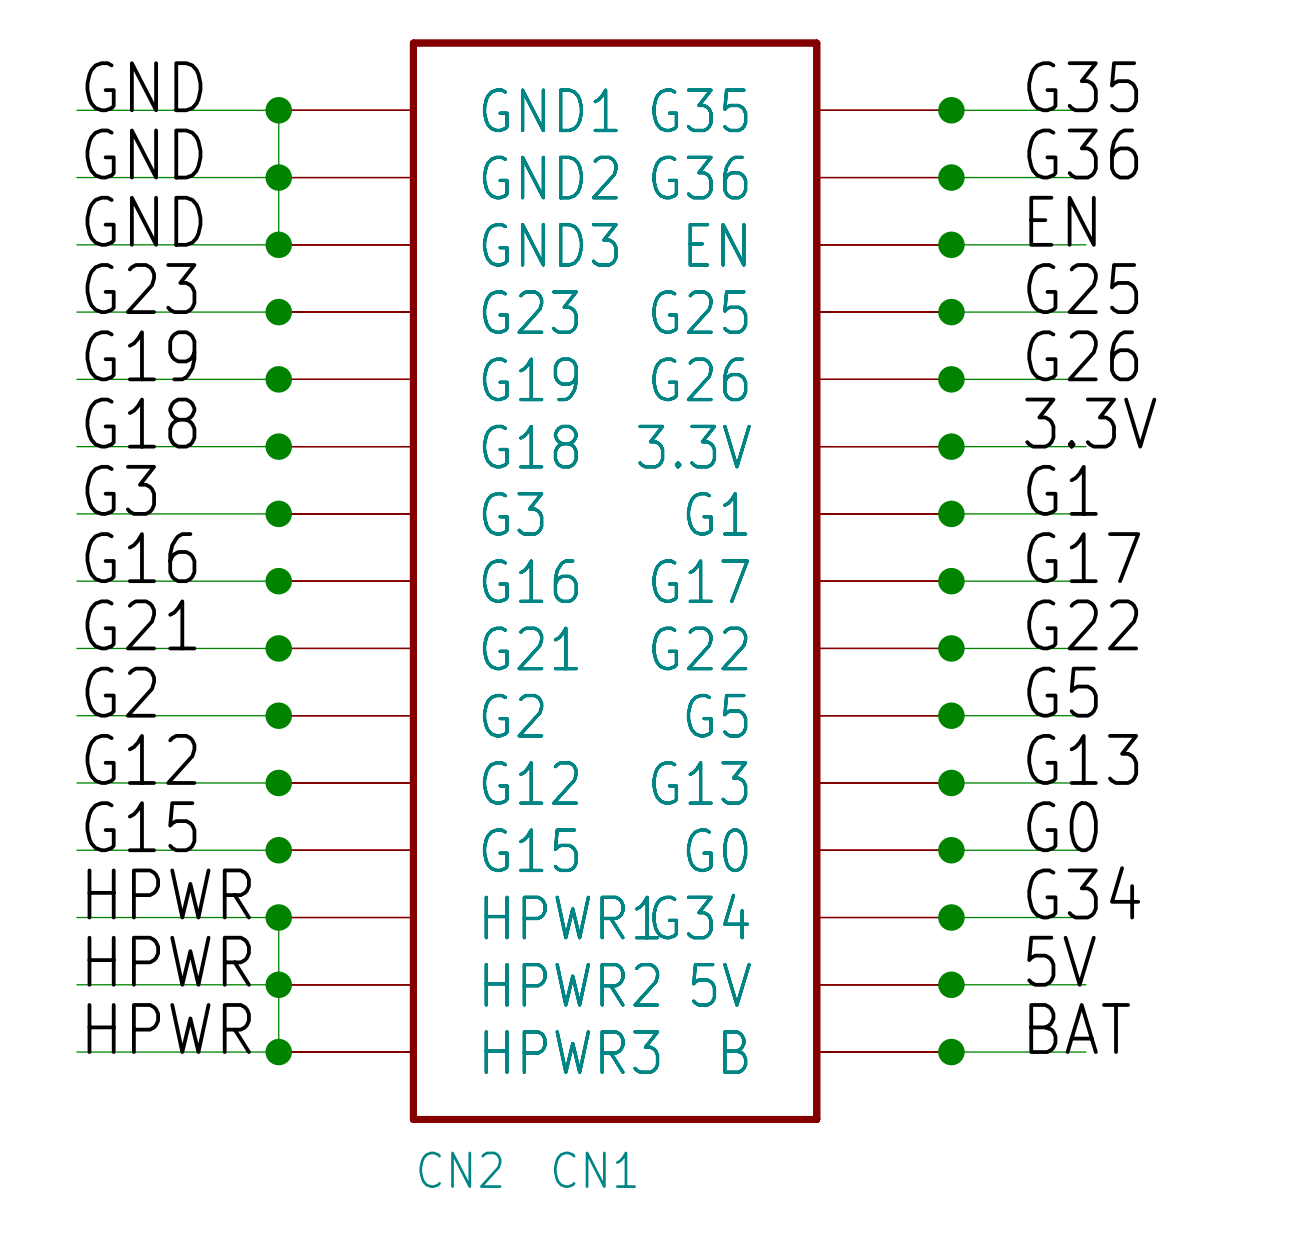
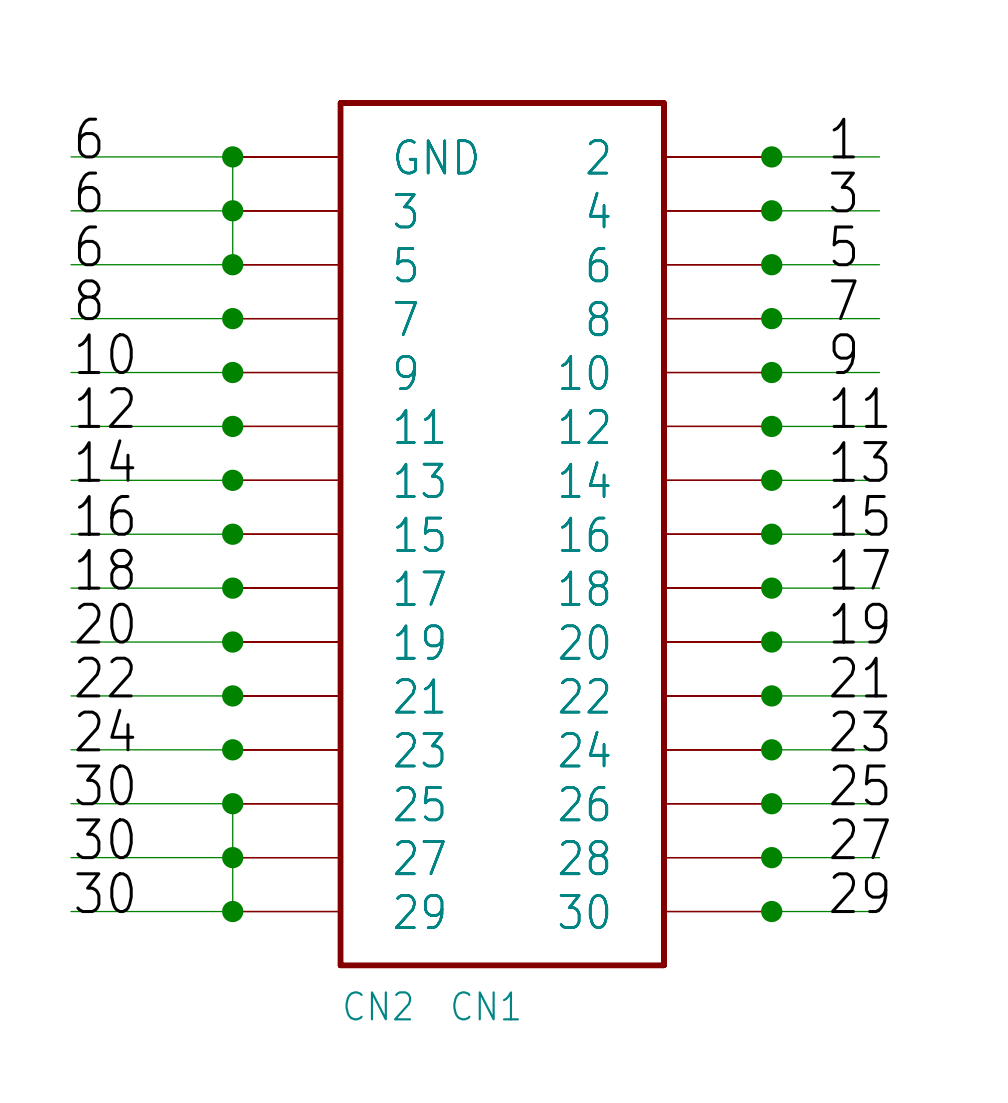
CN2 symbol: [278, 39, 952, 1123] -> [232, 100, 772, 969]
CN1 symbol: [278, 39, 952, 1123] -> [232, 100, 772, 969]
label: GND (143, 86) -> 6 (89, 138)
label: G35 (1082, 86) -> 1 (843, 138)
label: GND (143, 154) -> 6 (89, 191)
label: G36 (1082, 154) -> 3 (842, 191)
label: GND (143, 221) -> 6 (89, 245)
label: EN (1062, 221) -> 5 (843, 245)
label: G23 (140, 288) -> 8 (89, 299)
label: G25 (1082, 288) -> 7 (843, 299)
label: G19 (140, 355) -> 10 (105, 353)
label: G26 (1082, 355) -> 9 (843, 353)
label: G18 (140, 423) -> 12 (105, 407)
label: 3.3V (1090, 423) -> 11 (859, 407)
label: G3 (120, 490) -> 14 (106, 460)
label: G1 (1062, 490) -> 13 (859, 461)
label: G16 (140, 557) -> 16 (105, 515)
label: G17 (1083, 557) -> 15 (859, 515)
label: G21 (140, 624) -> 18 (105, 569)
label: G22 (1082, 624) -> 17 (860, 569)
label: G2 (120, 692) -> 20 (104, 623)
label: G5 (1062, 692) -> 19 (859, 623)
label: G12 (140, 759) -> 22 (104, 677)
label: G13 (1082, 759) -> 21 (859, 677)
label: G15 (140, 826) -> 24 (105, 730)
label: G0 (1062, 826) -> 23 (859, 730)
label: G34 (1083, 892) -> 25 (859, 784)
label: HPWR (169, 893) -> 30 (104, 784)
label: HPWR (169, 961) -> 30 (104, 838)
label: 5V (1061, 961) -> 27 (859, 838)
label: HPWR (169, 1028) -> 30 (104, 892)
label: BAT (1079, 1028) -> 29 (859, 892)

